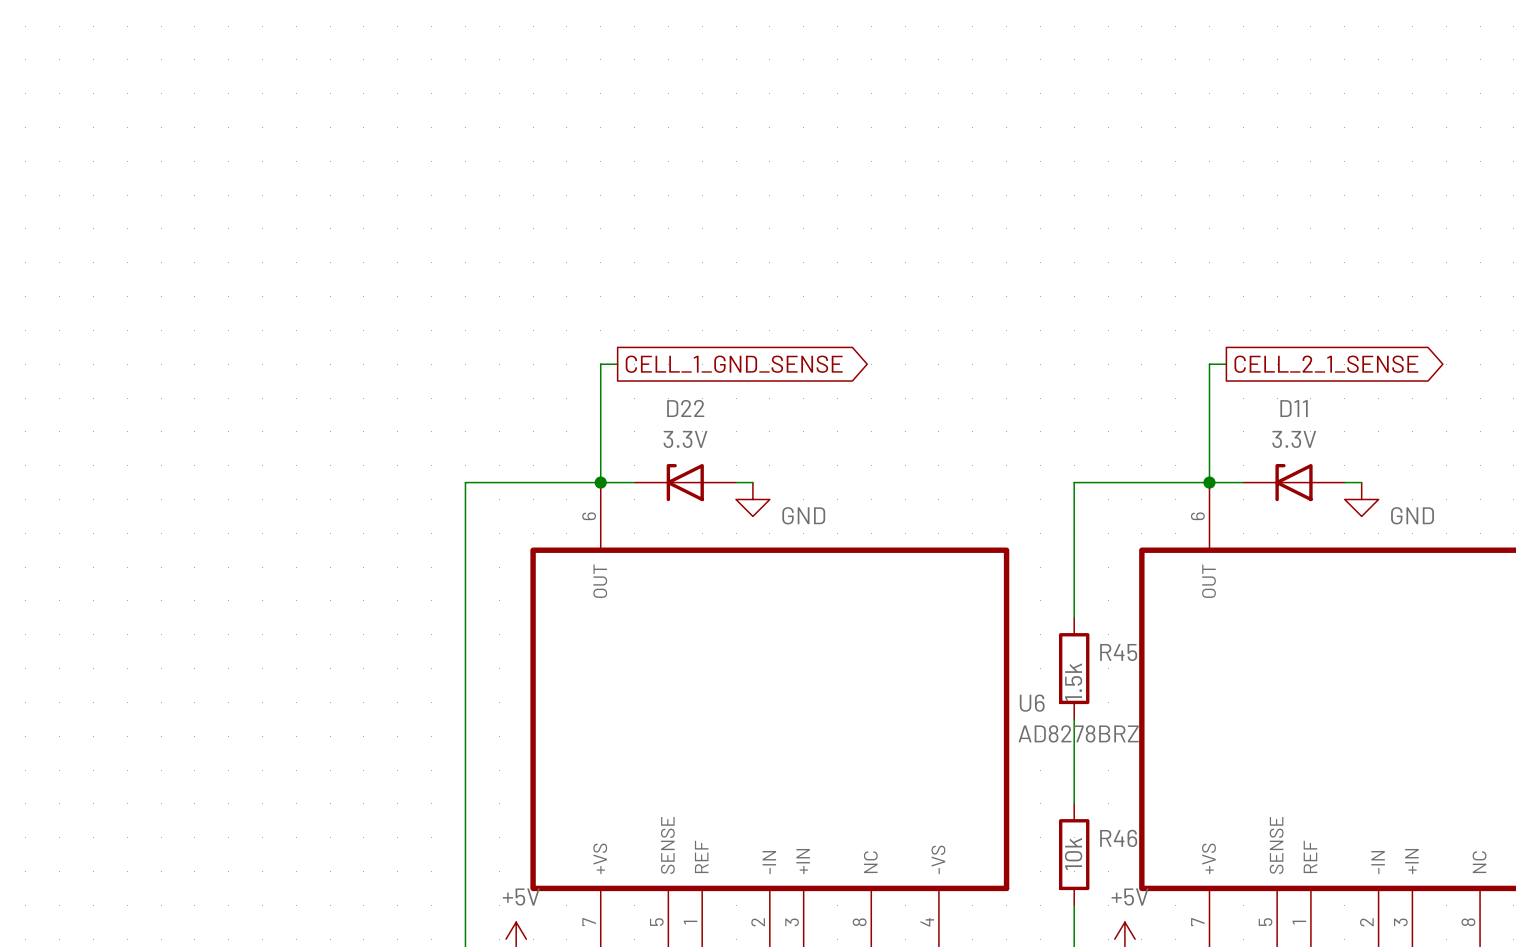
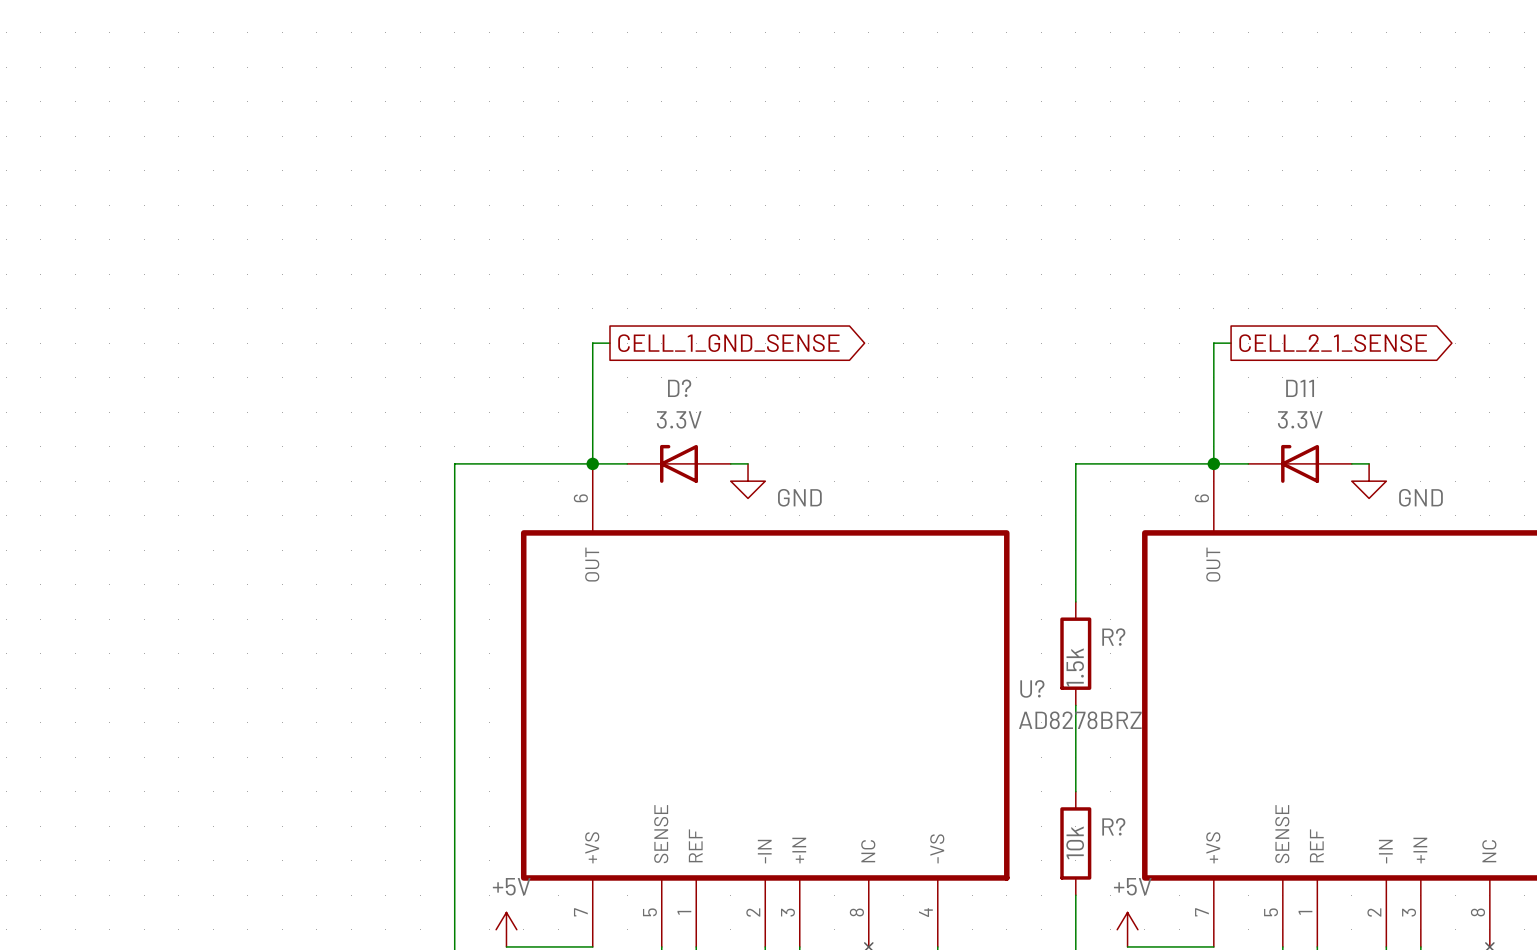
D22 name: D22 (685, 408) -> D? (679, 388)
R45 name: R45 (1118, 652) -> R? (1113, 637)
U6 name: U6 (1032, 703) -> U? (1032, 688)
R46 name: R46 (1118, 838) -> R? (1113, 826)

